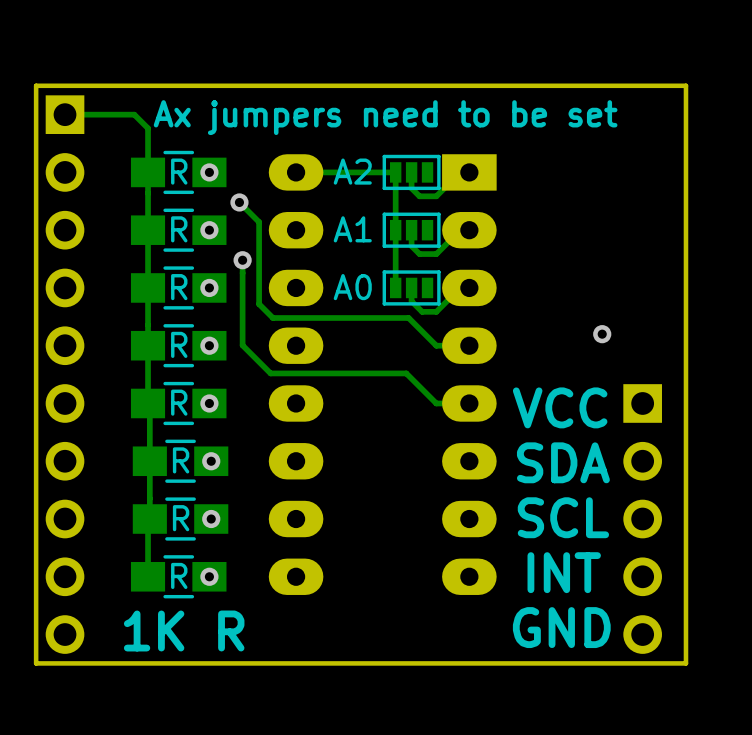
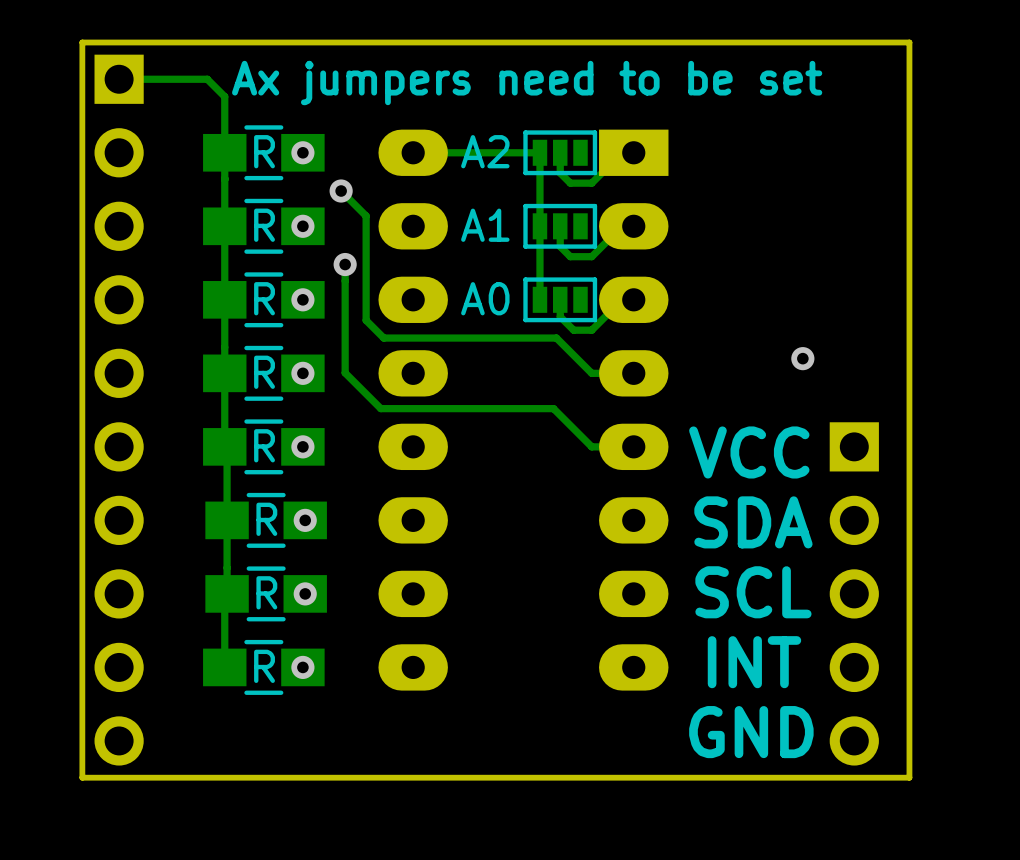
text: 1K R (184, 630) -> none

